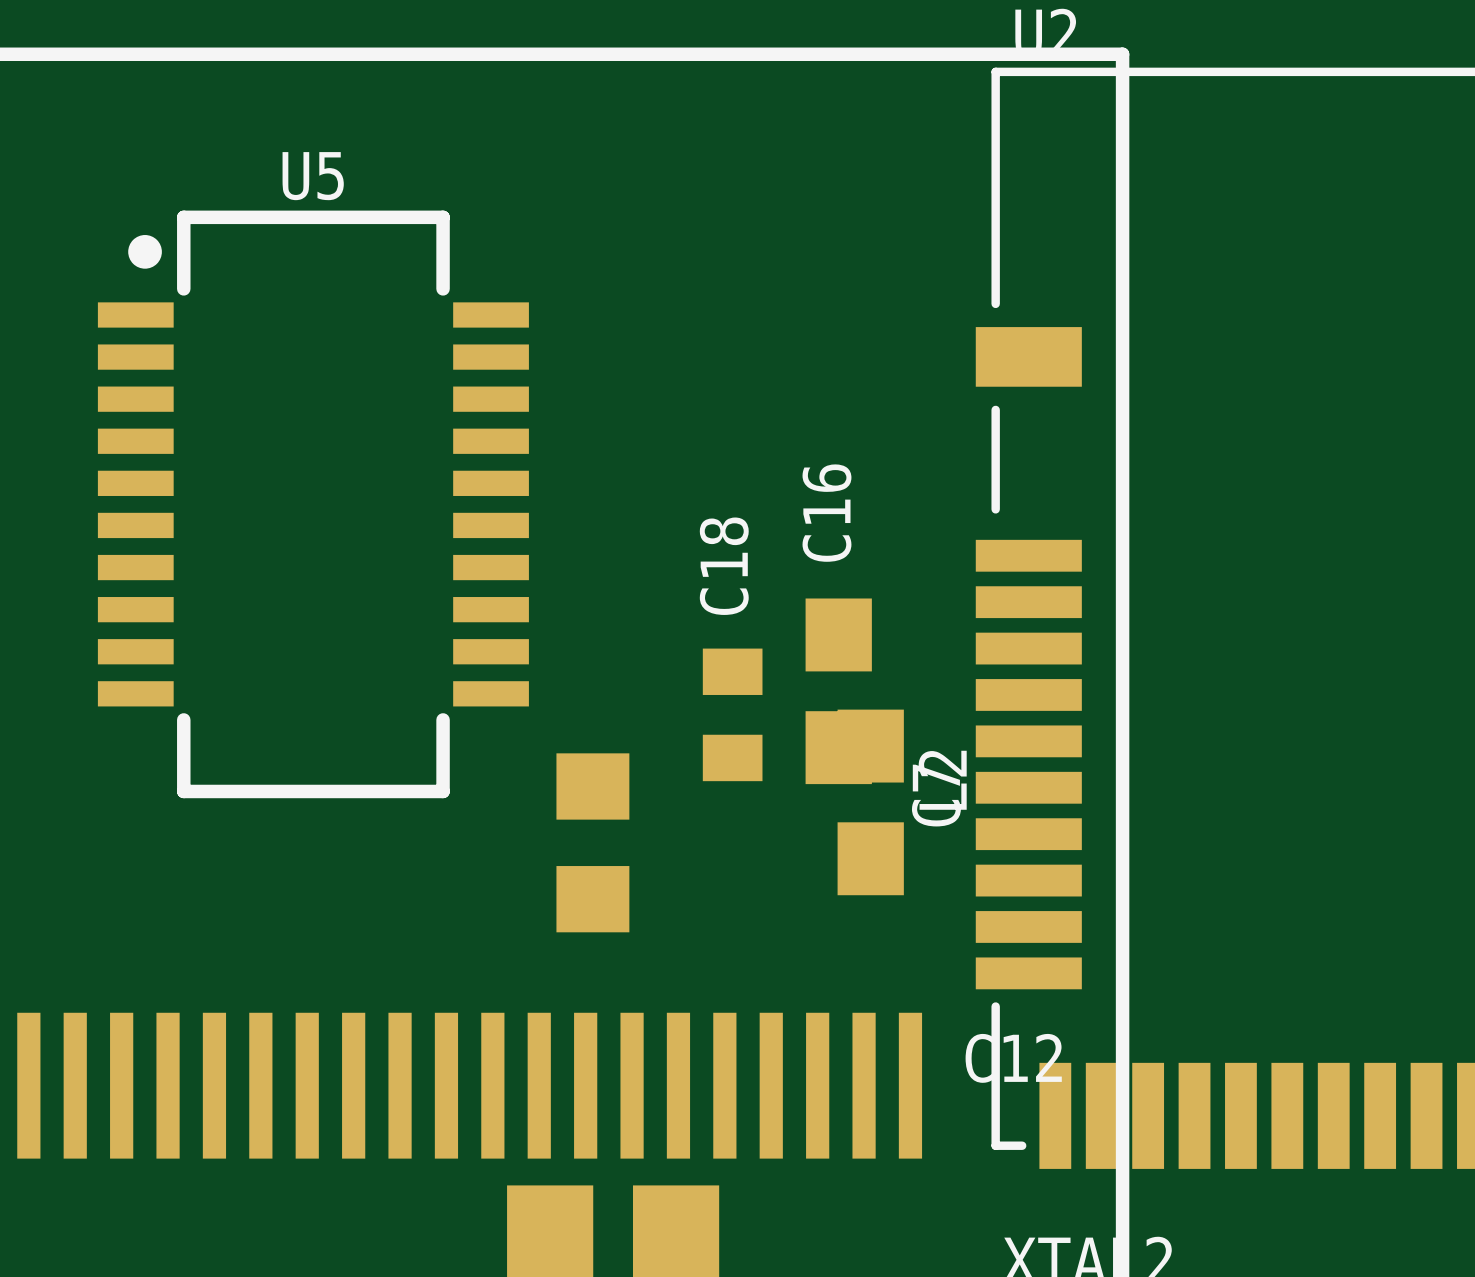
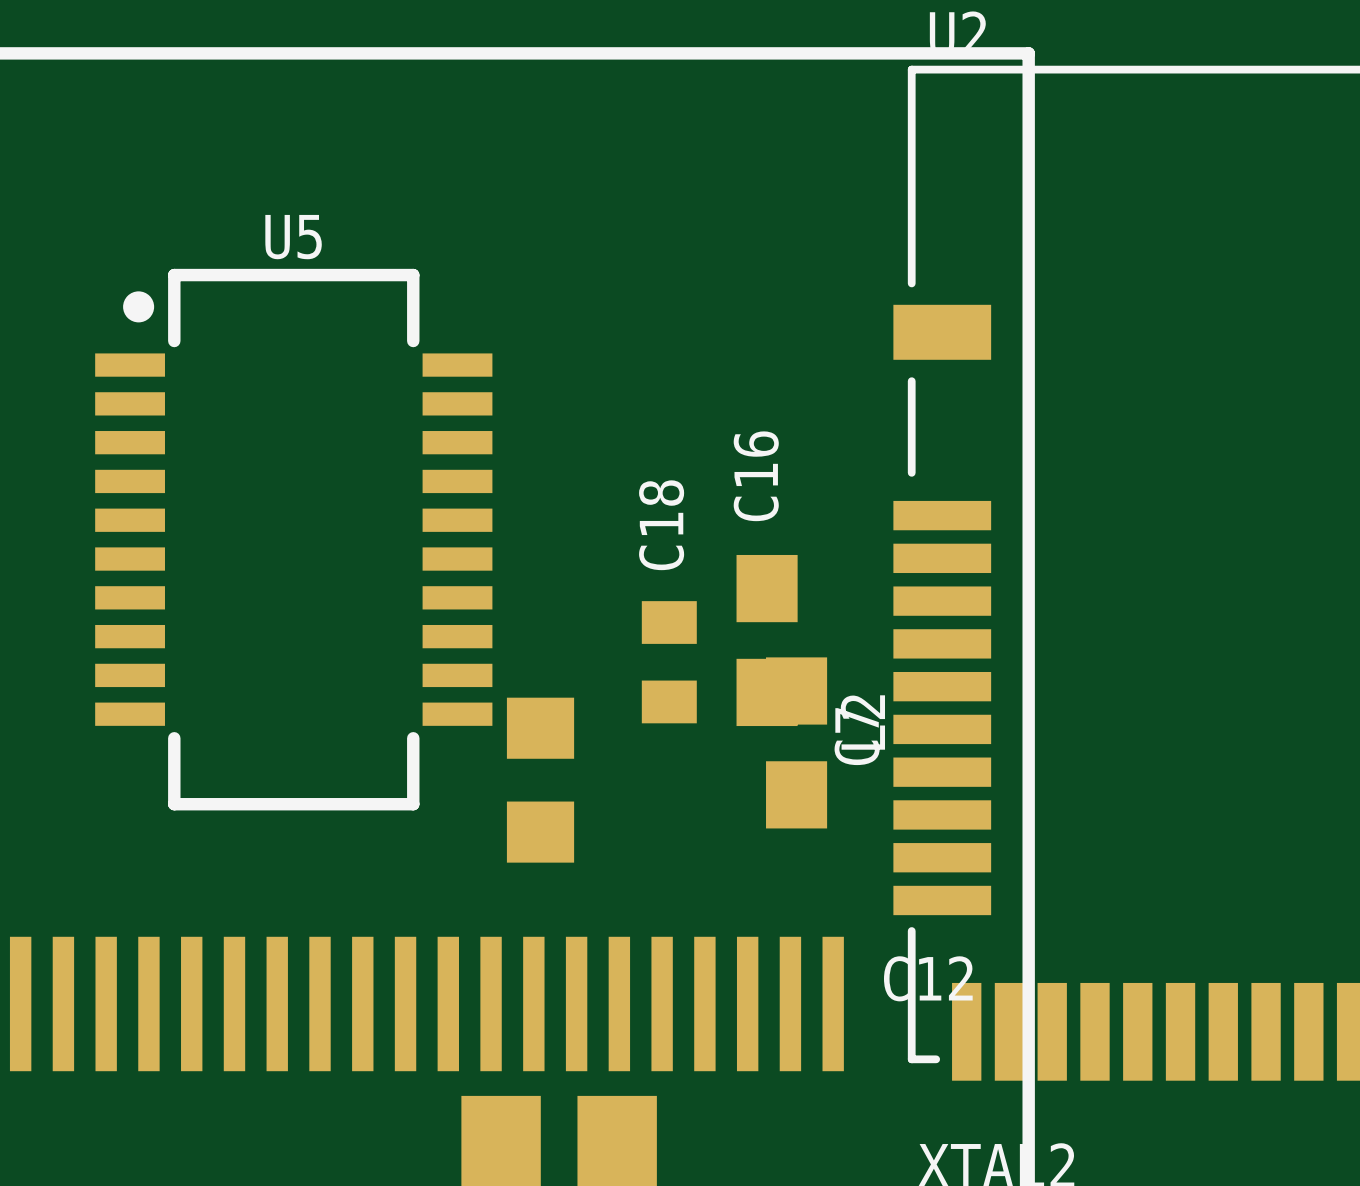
U5 position: (313, 504) -> (293, 539)

